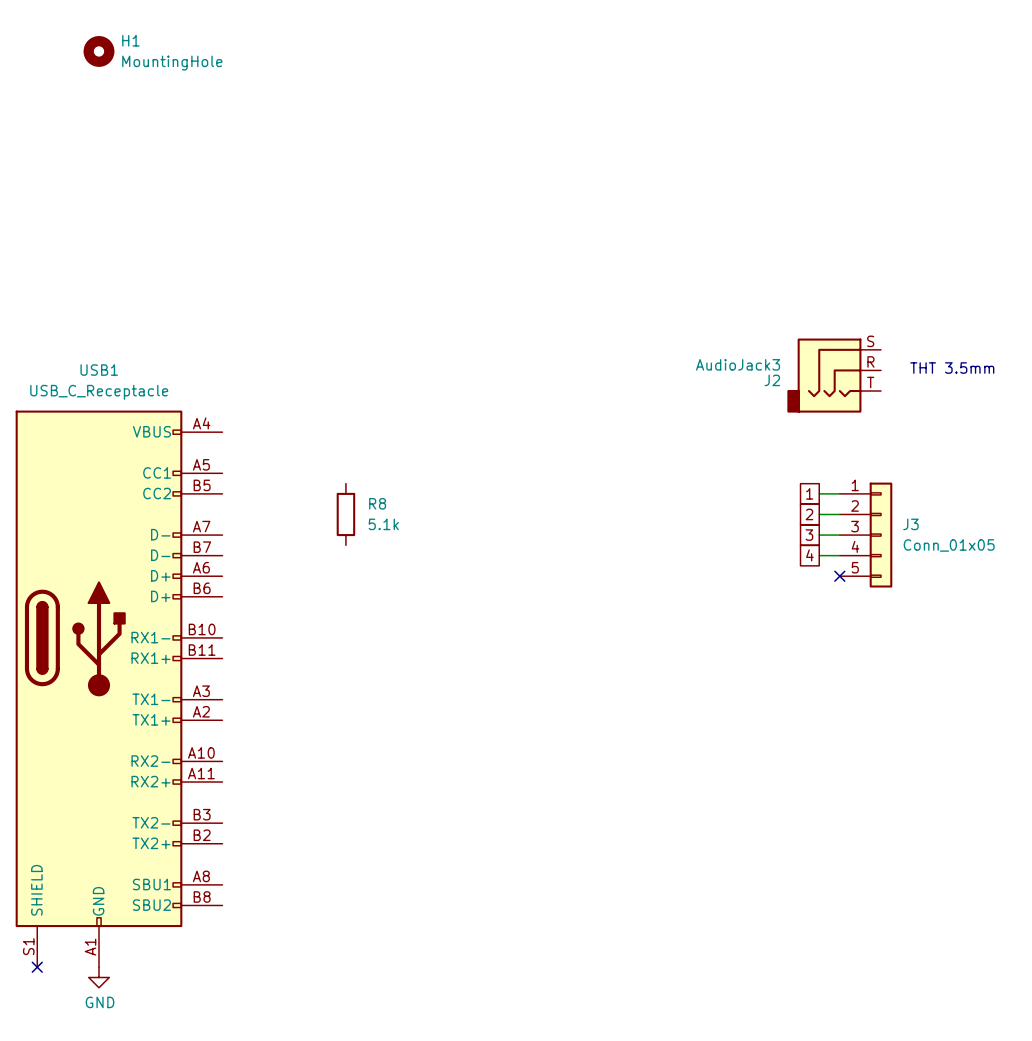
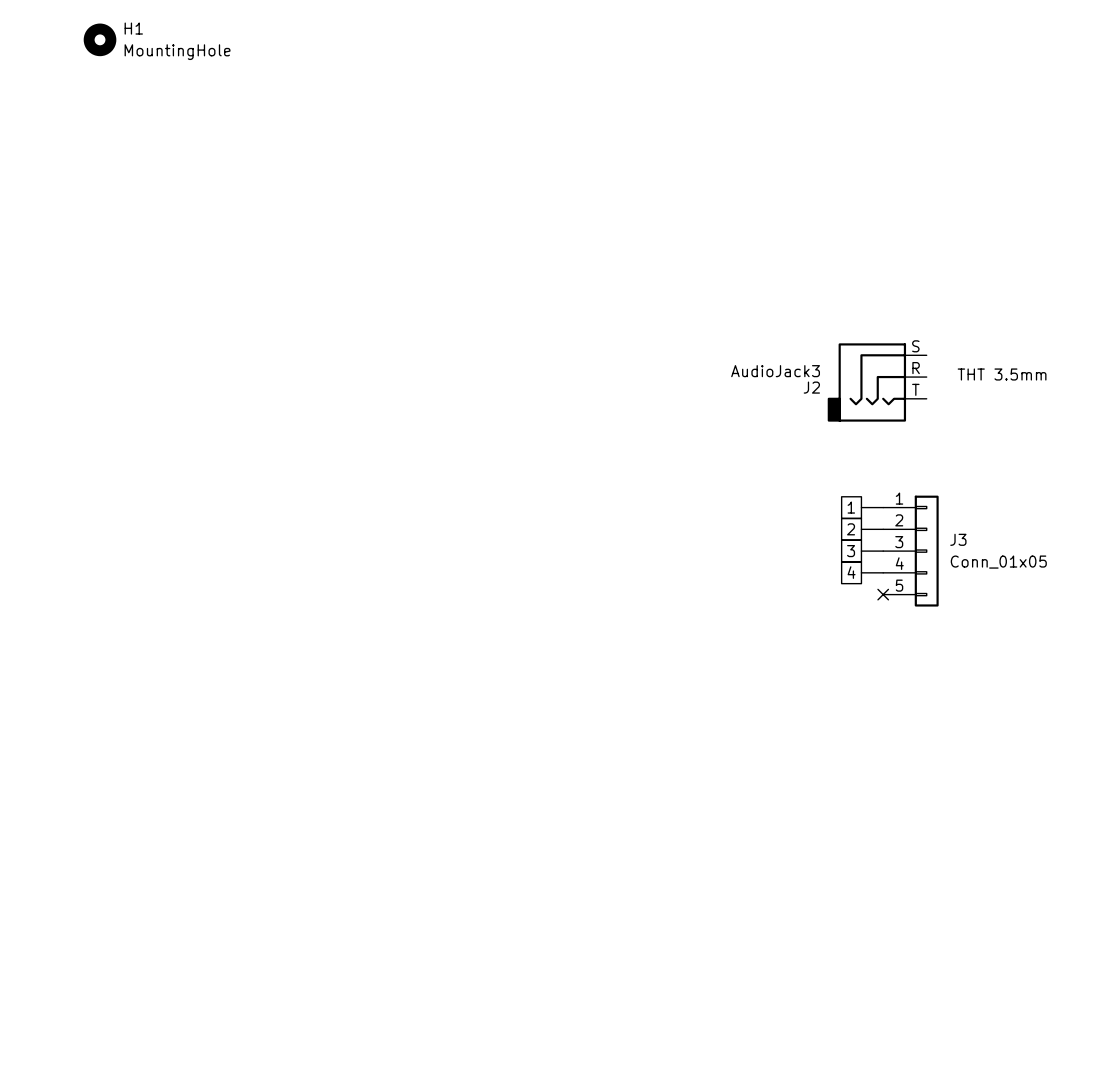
R8: 5.1k (345, 514) -> none
USB1: USB_C_Receptacle (119, 688) -> none
no-connect mark: (37, 967) -> none
power symbol: GND (99, 977) -> none

